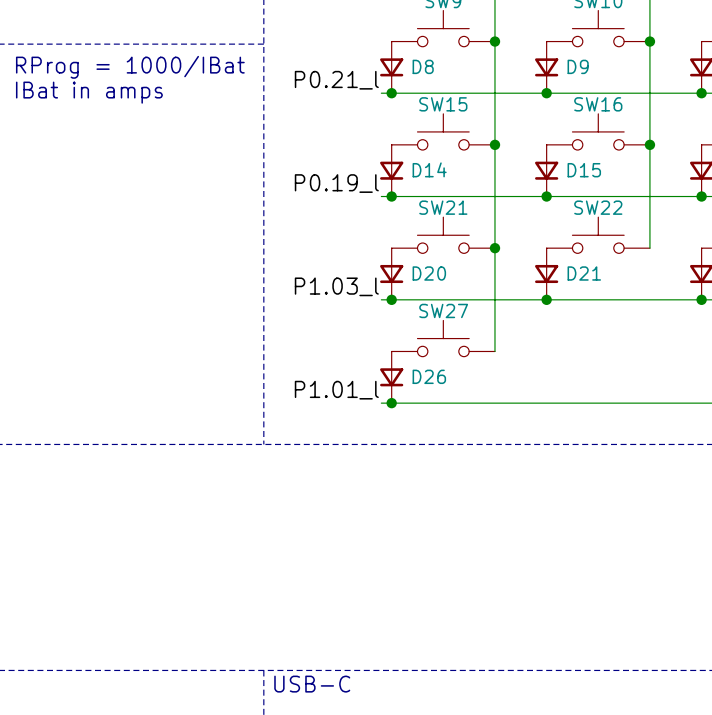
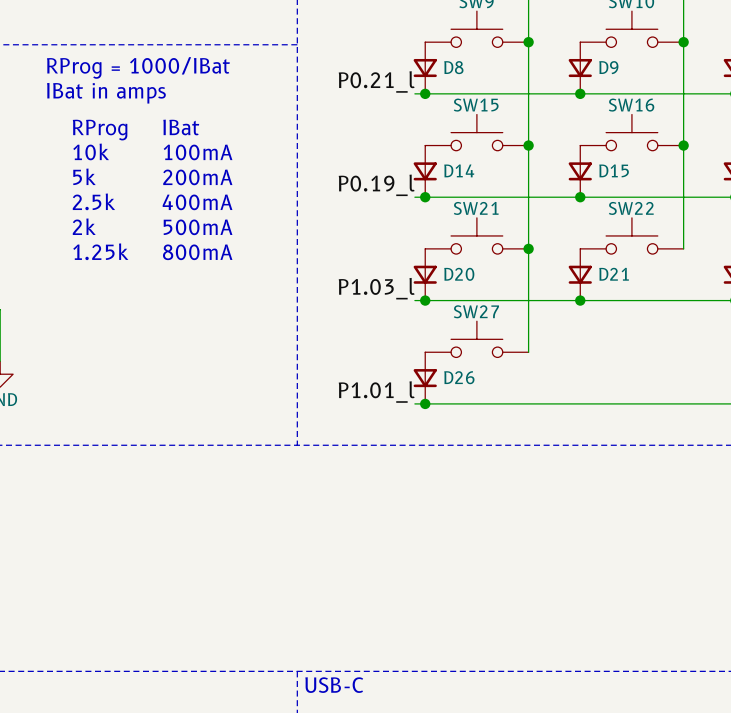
text: none -> IBat (181, 127)
text: none -> RProg (100, 130)
text: none -> 10k (91, 151)
text: none -> 100mA (198, 152)
text: none -> 5k (84, 176)
text: none -> 200mA (197, 177)
text: none -> 2.5k (93, 201)
text: none -> 400mA (197, 202)
text: none -> 2k (84, 226)
text: none -> 500mA (198, 227)
text: none -> 1.25k (100, 251)
text: none -> 800mA (197, 252)

